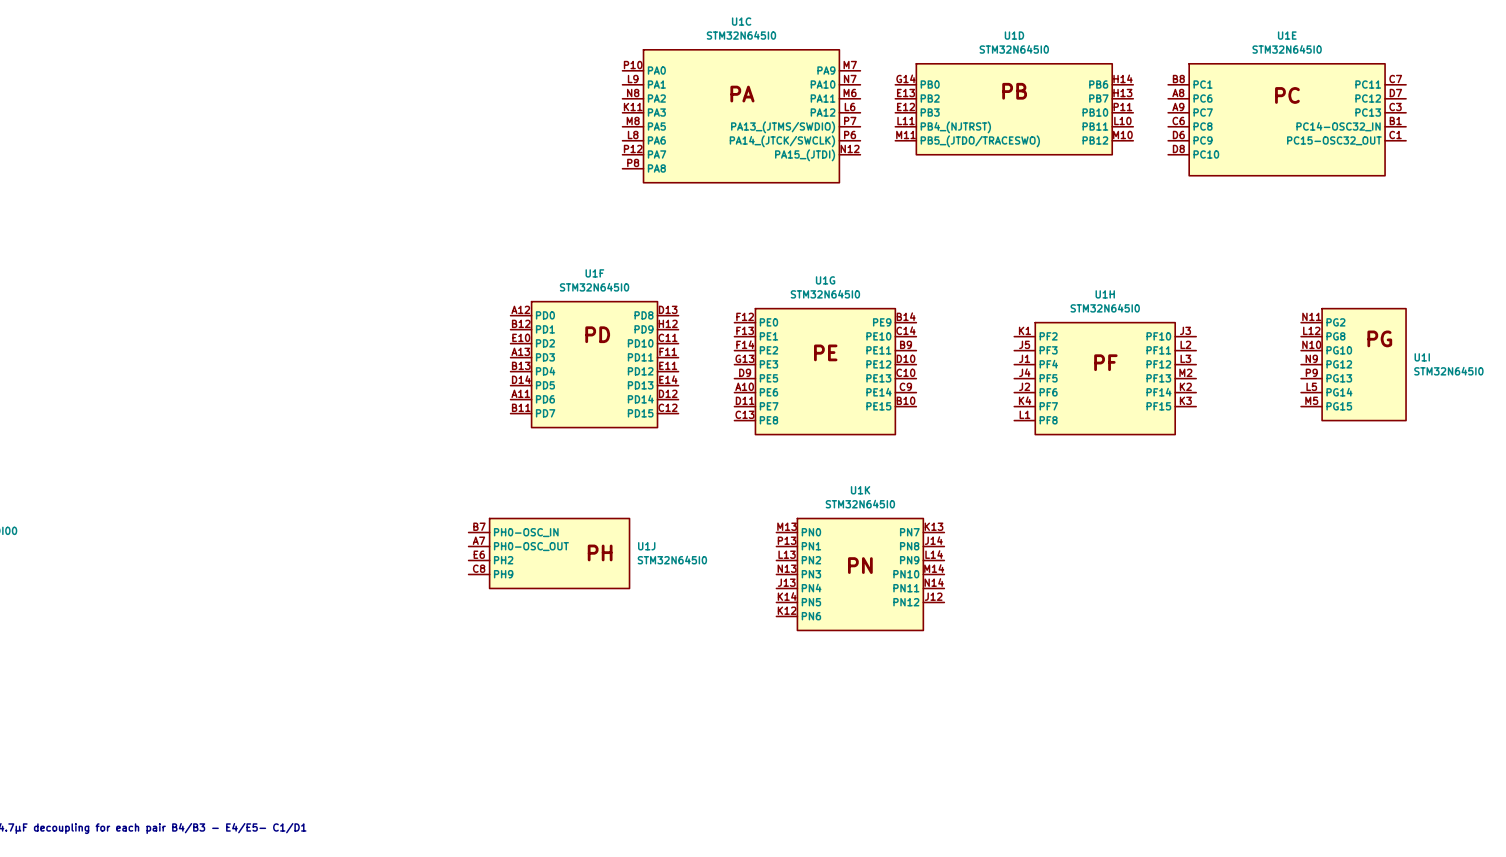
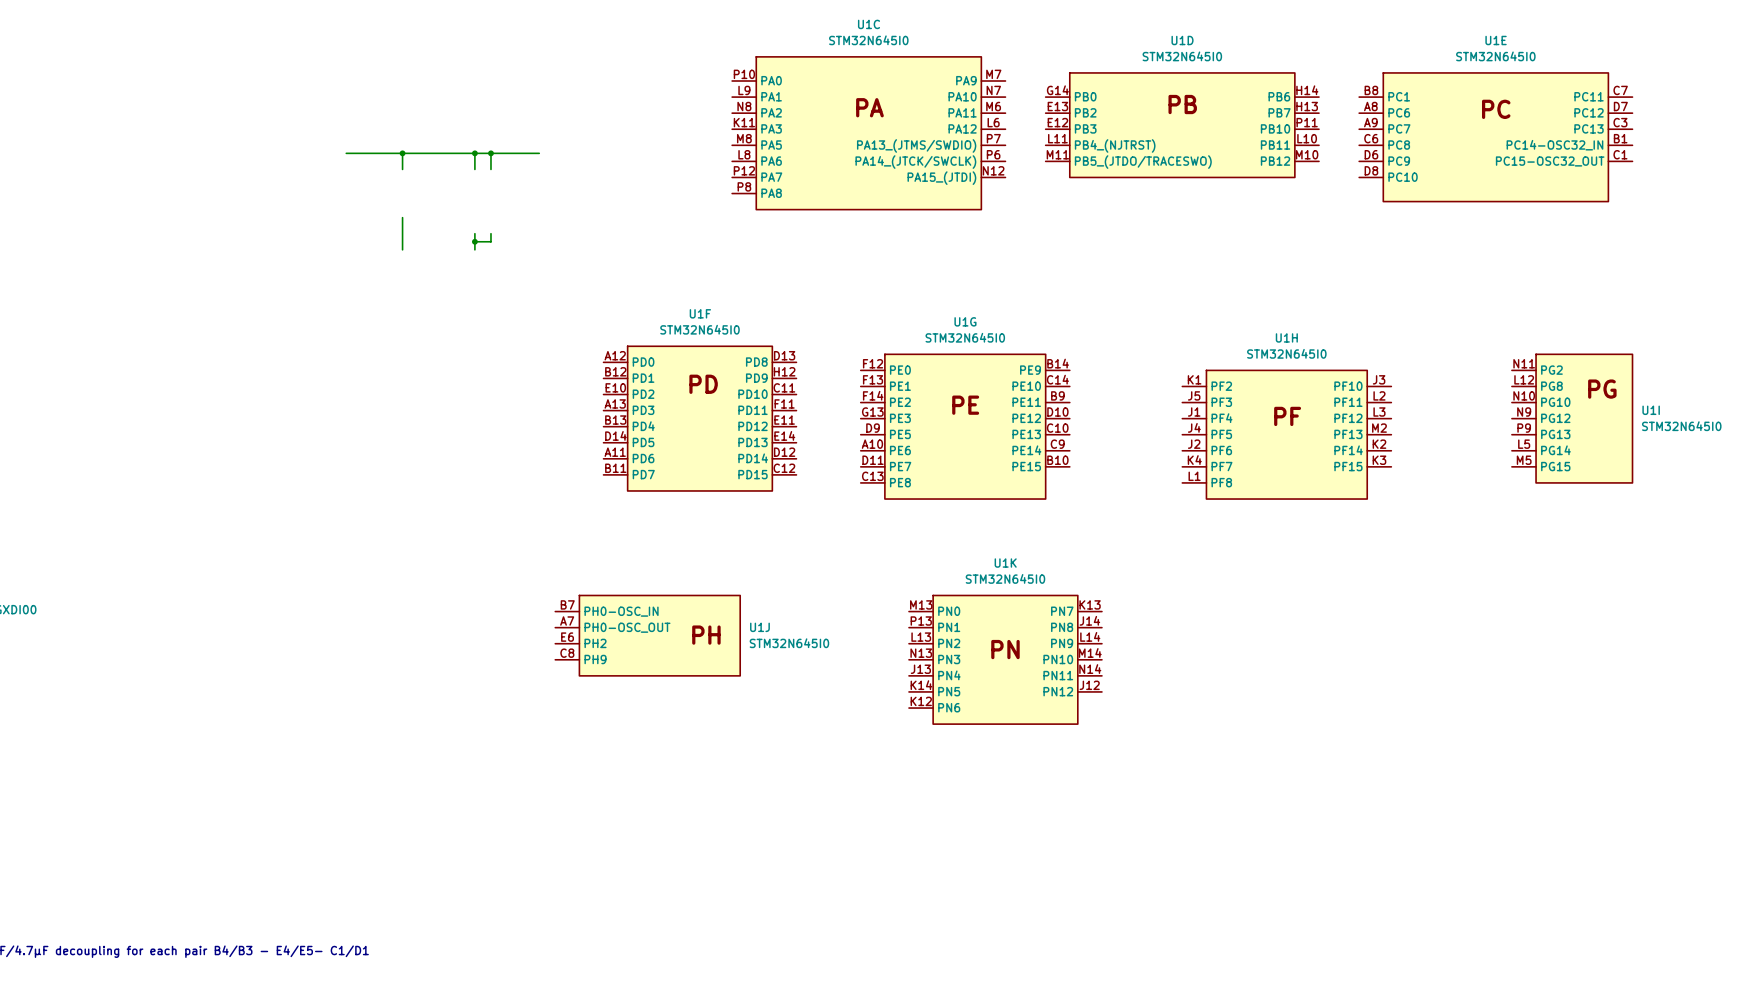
wire: none -> (346, 153) (539, 153)
wire: none -> (402, 153) (402, 169)
junction: none -> (402, 153)
wire: none -> (474, 153) (474, 169)
junction: none -> (474, 153)
wire: none -> (490, 153) (490, 169)
junction: none -> (490, 153)
wire: none -> (402, 217) (402, 249)
wire: none -> (474, 233) (474, 249)
wire: none -> (490, 233) (490, 241) (474, 241)
junction: none -> (474, 241)

